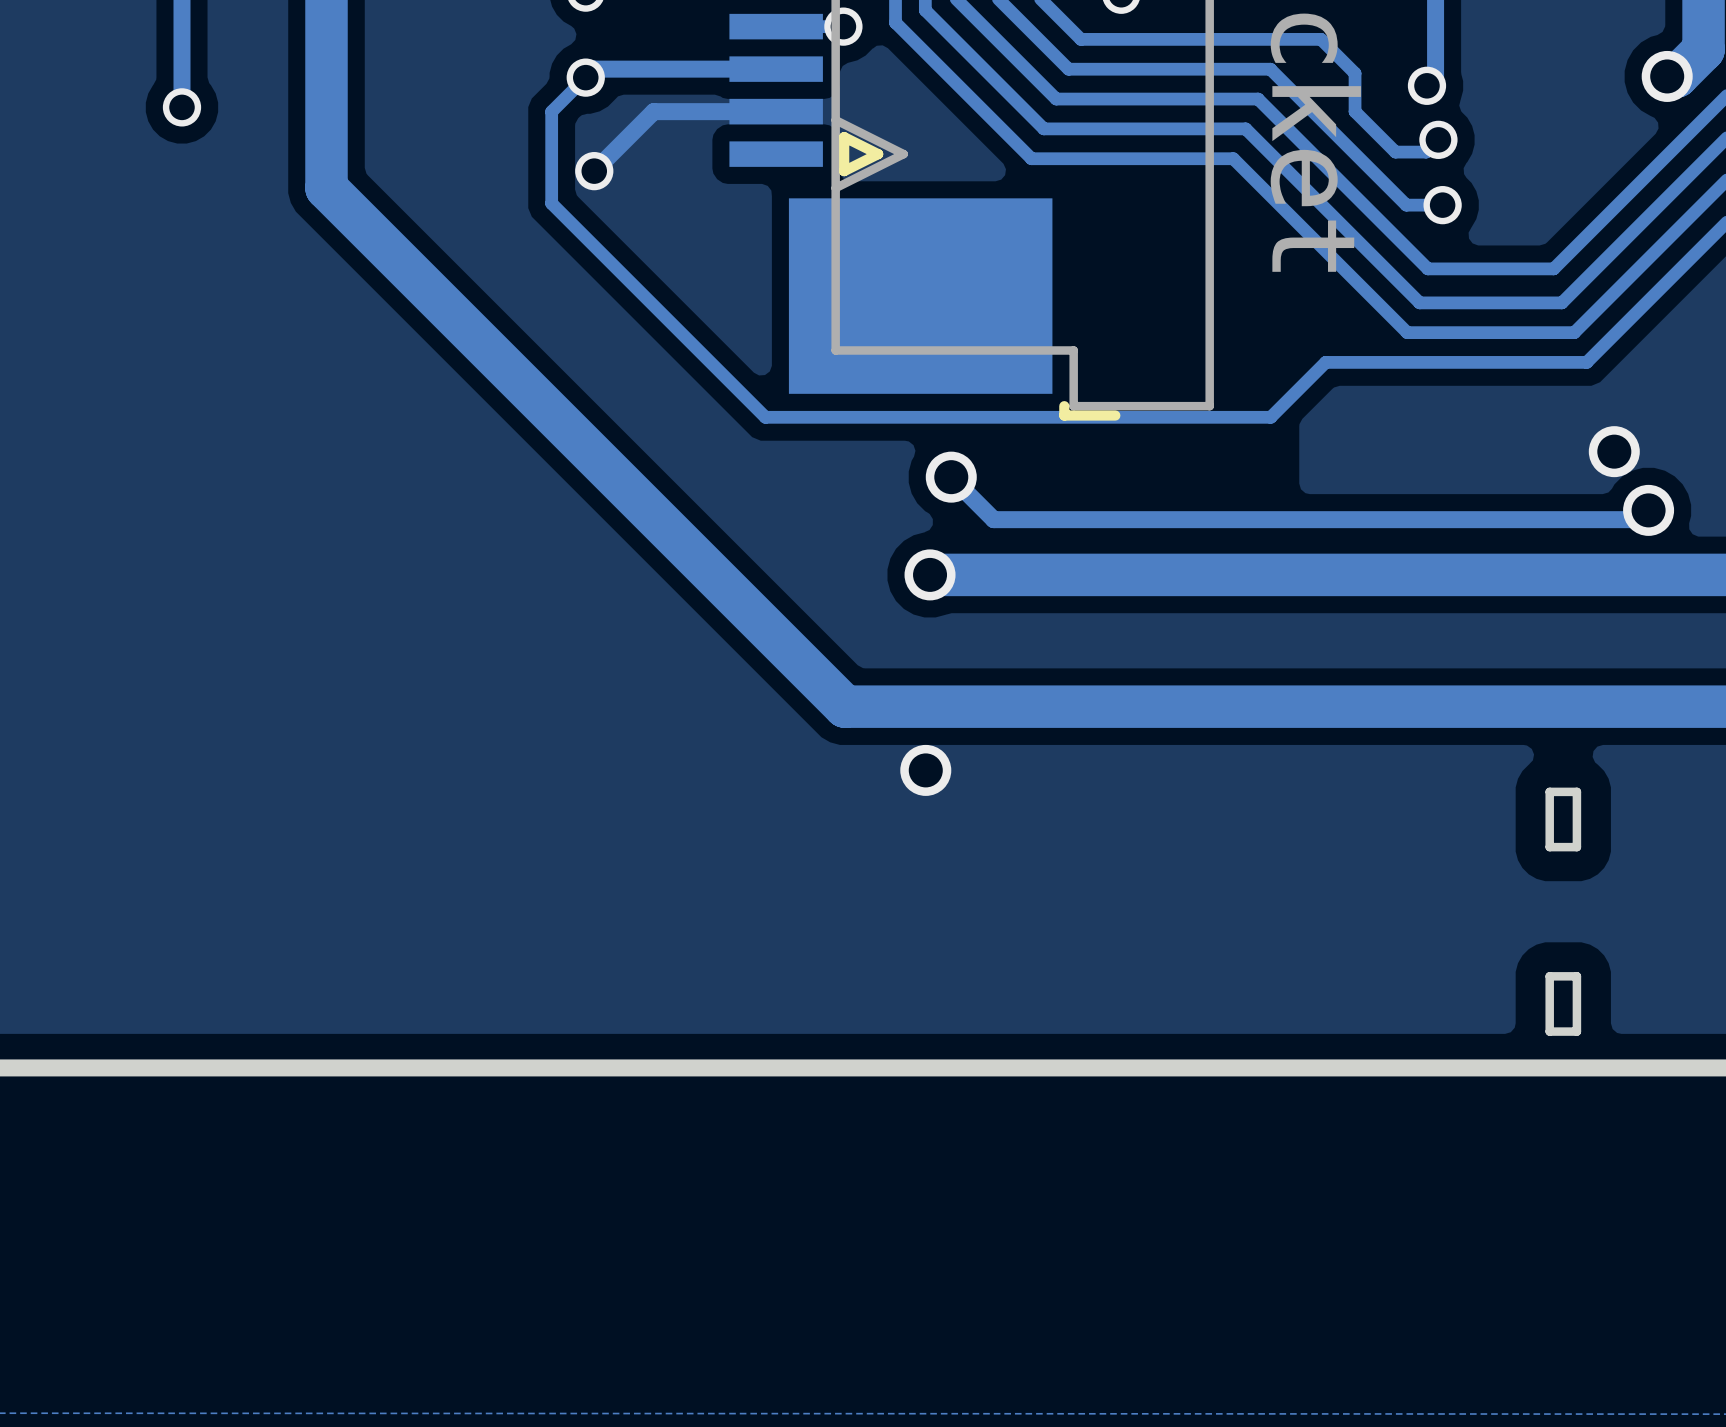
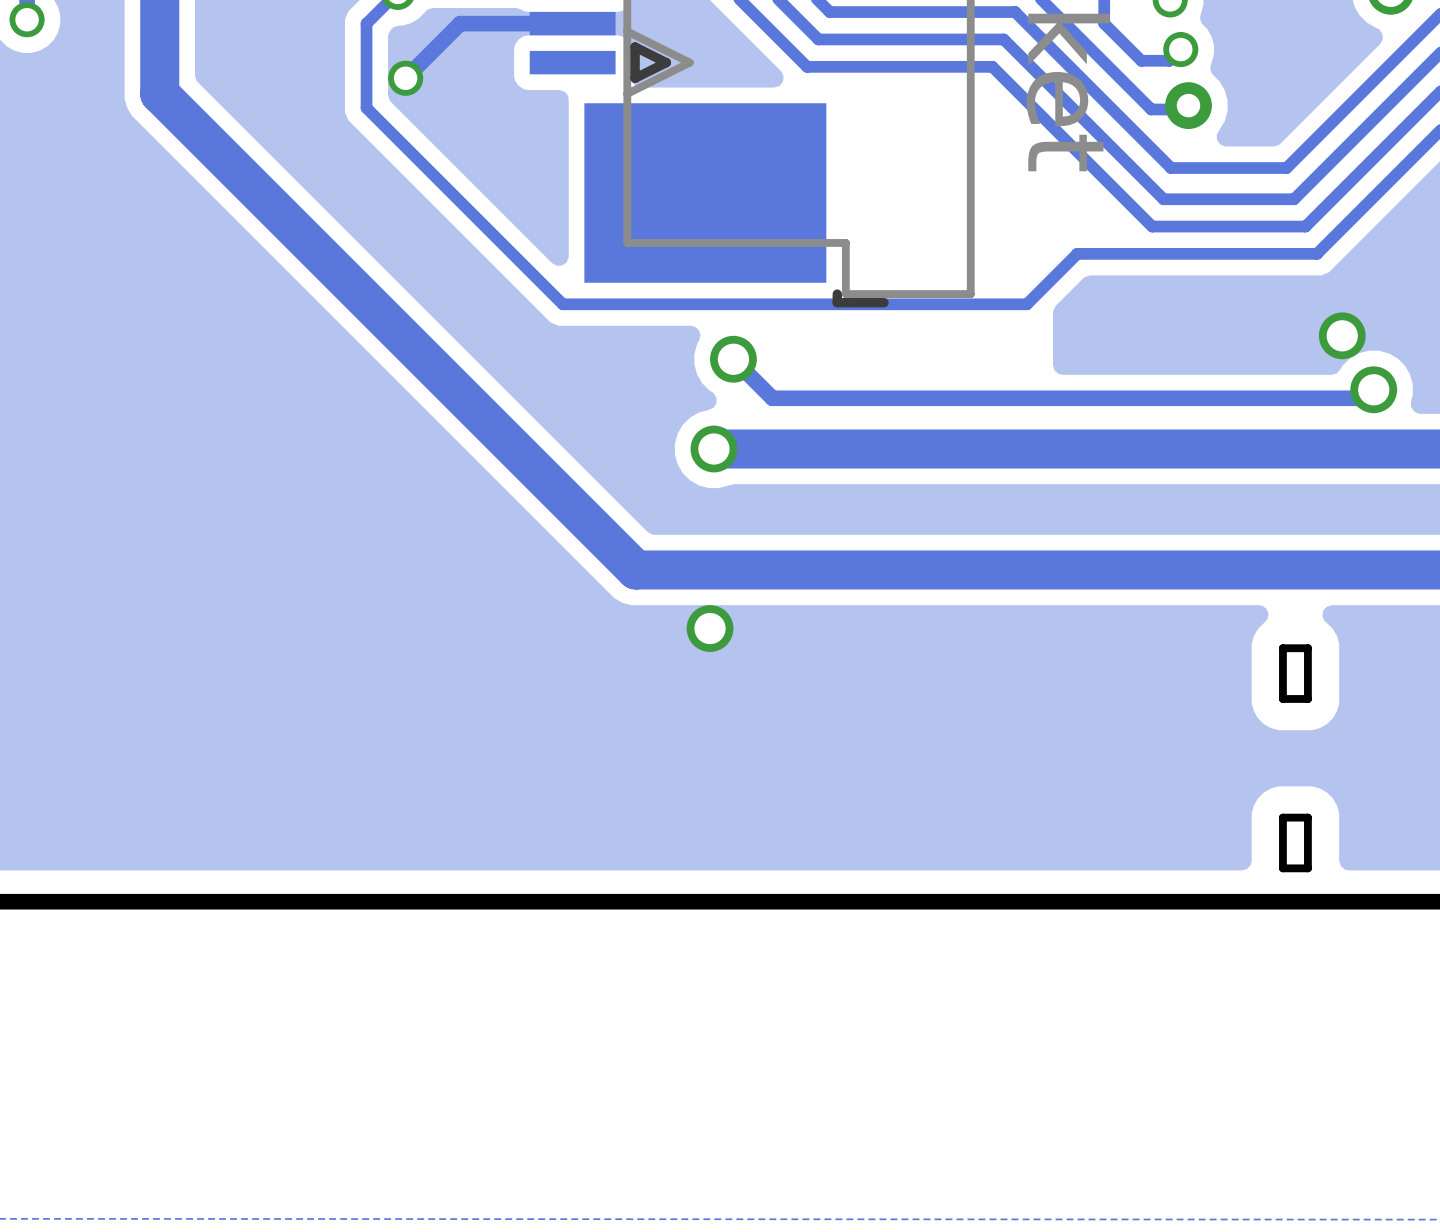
via size: [1423, 186, 1462, 225] -> [1165, 82, 1212, 130]

